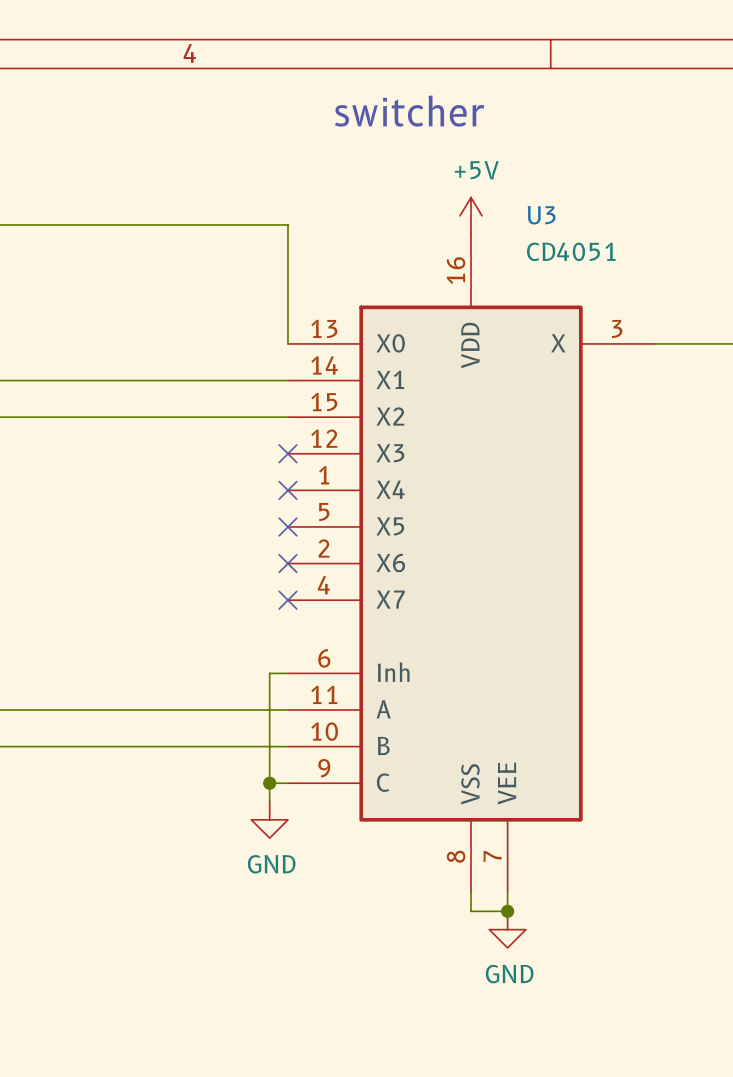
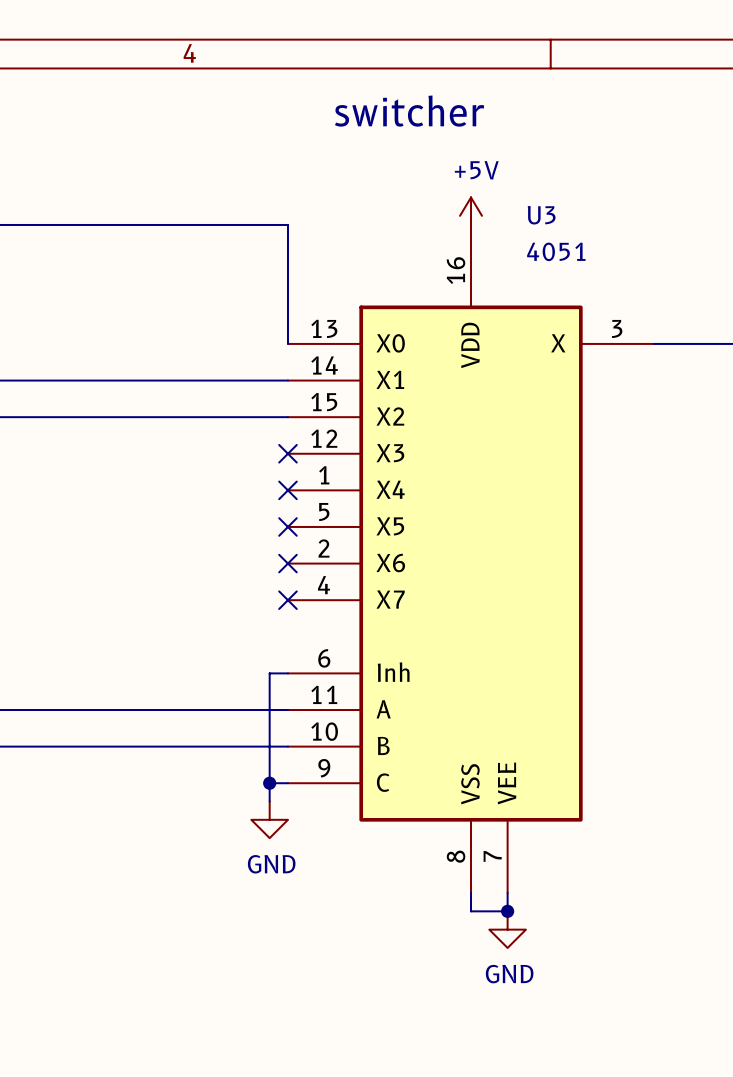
U3 value: CD4051 (571, 251) -> 4051 (556, 251)

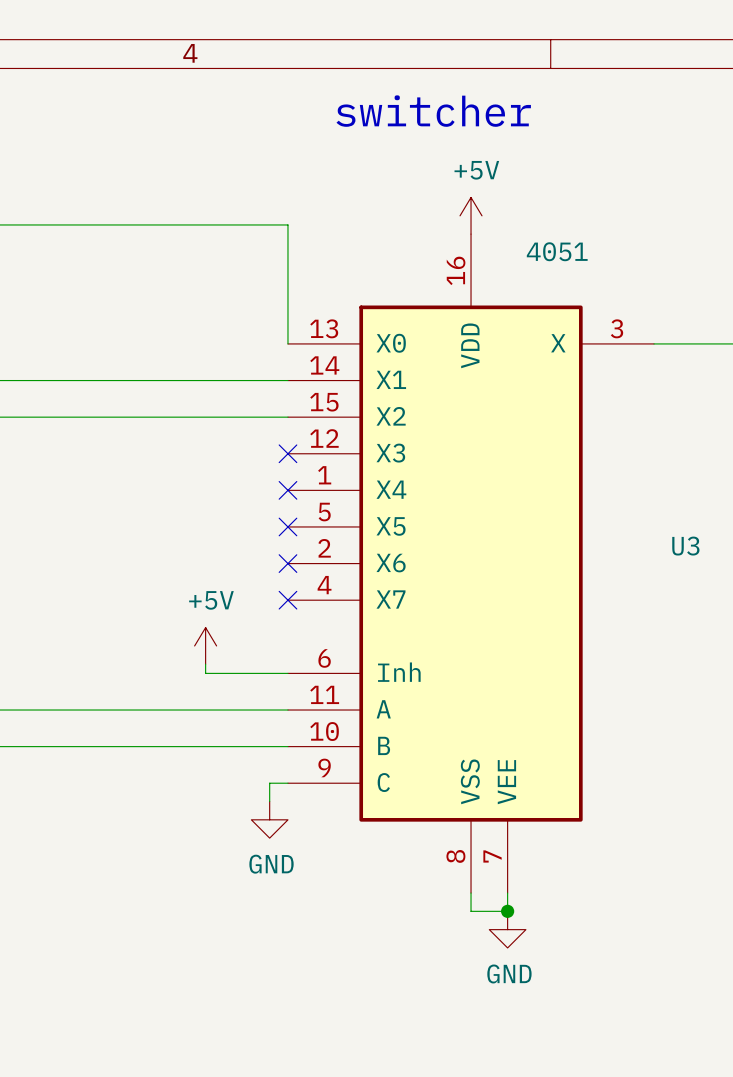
U3 name position: U3 (541, 215) -> U3 (685, 546)
power symbol: none -> +5V (205, 645)
wire: (269, 673) (269, 783) -> (269, 673) (205, 673) (205, 664)
junction: (269, 783) -> none

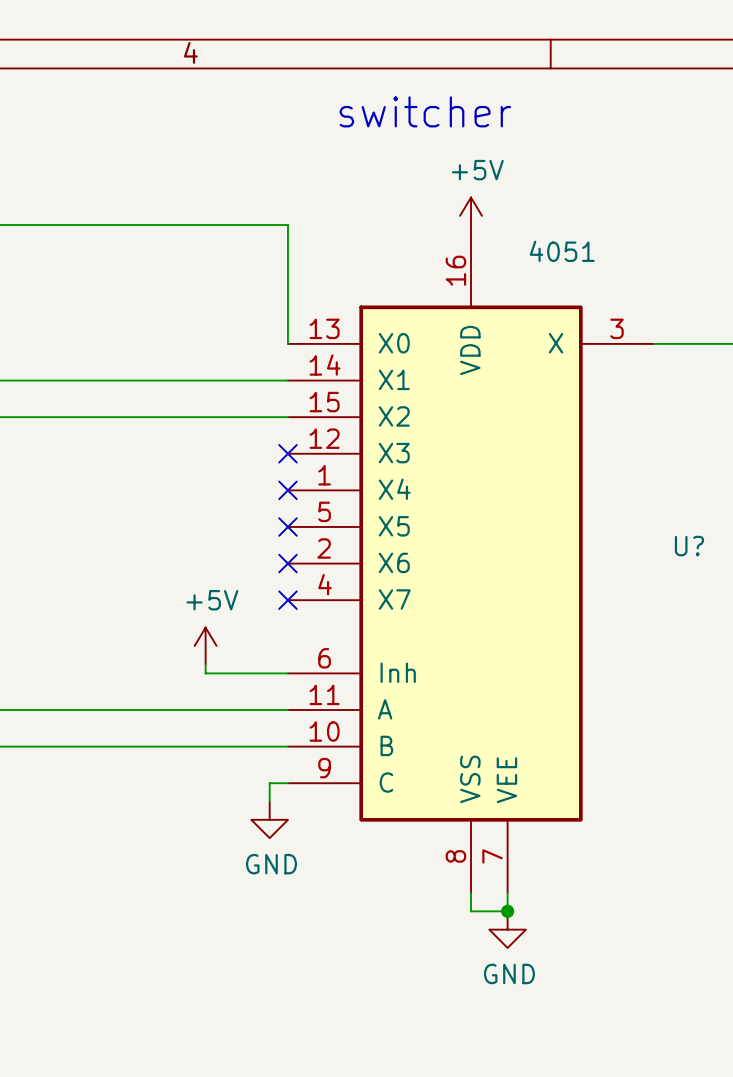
U3 name: U3 (685, 546) -> U? (689, 546)

